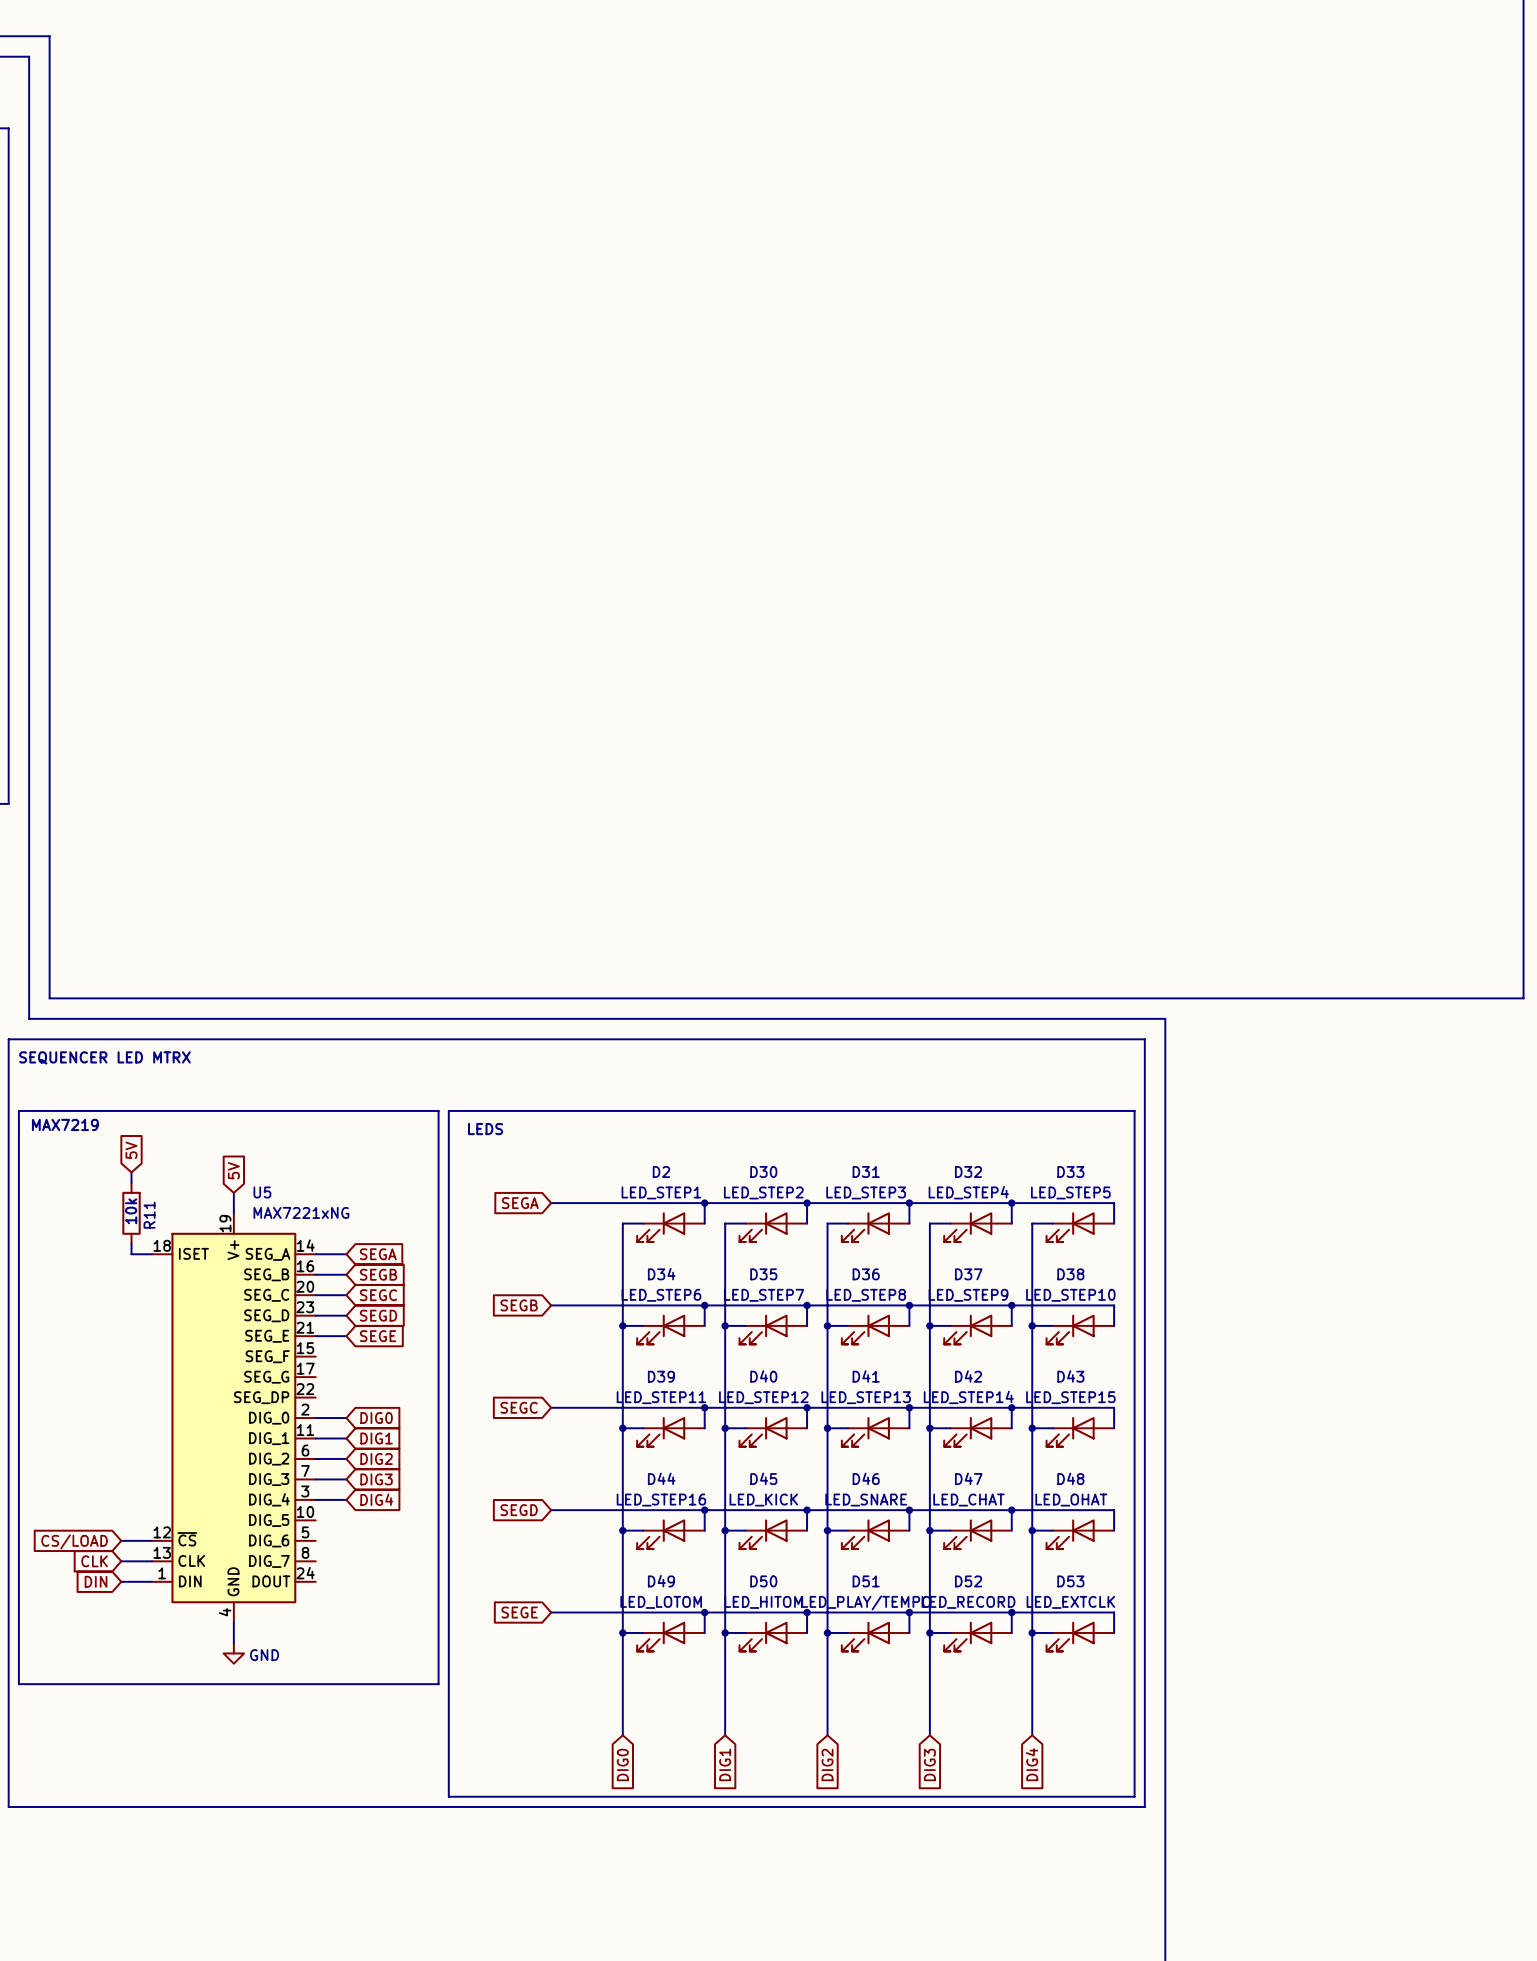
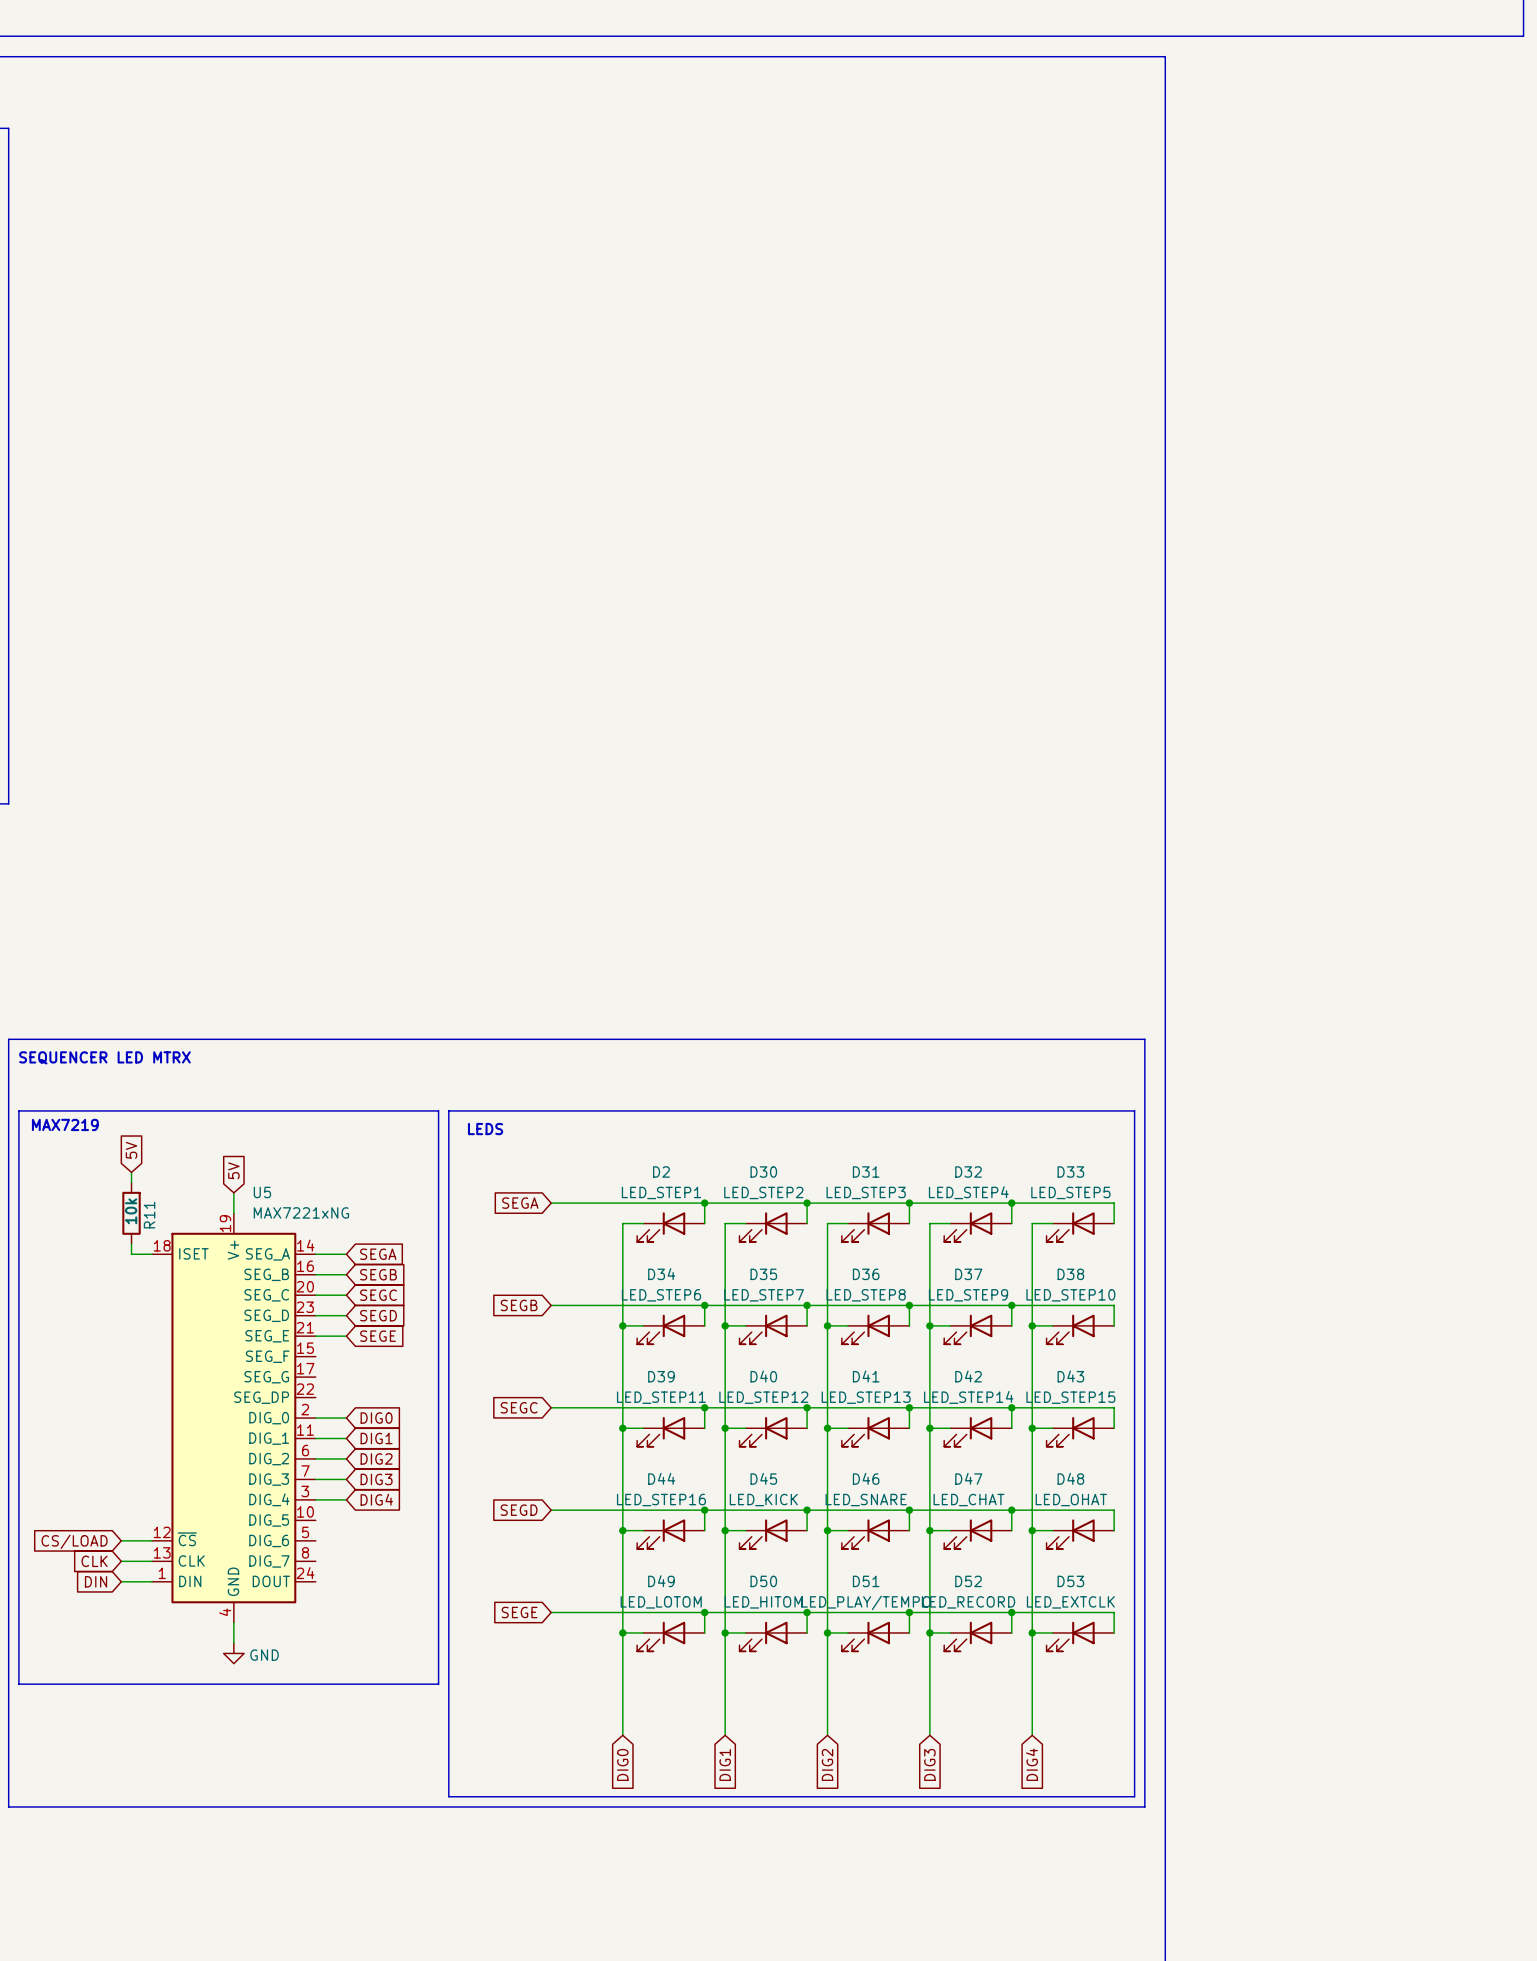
line: (49, 36) (49, 998) (1523, 998) (1523, 36) -> (49, 36) (1523, 36)
line: (29, 56) (29, 1018) (1165, 1018) -> (29, 56) (1165, 56) (1165, 1018)

